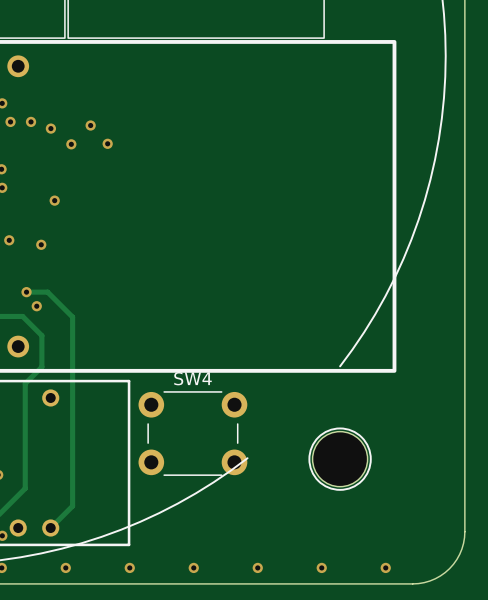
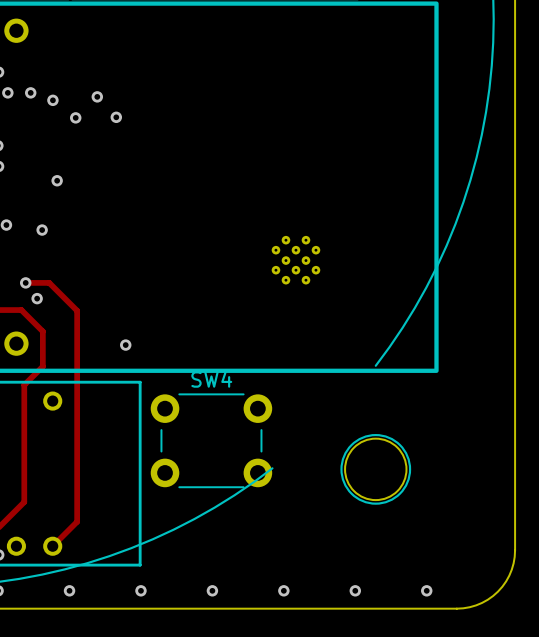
part: none -> (295, 260)
via: none -> (125, 345)

